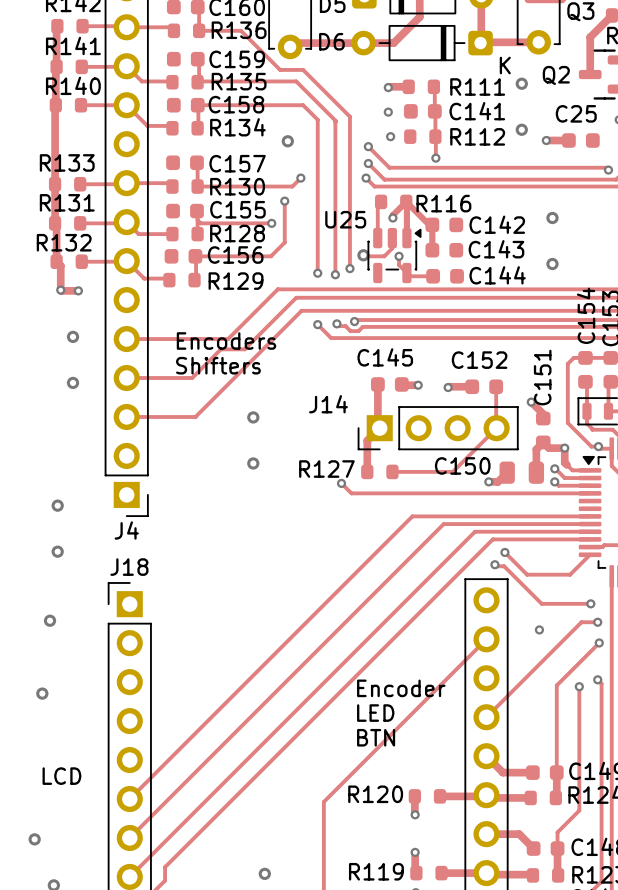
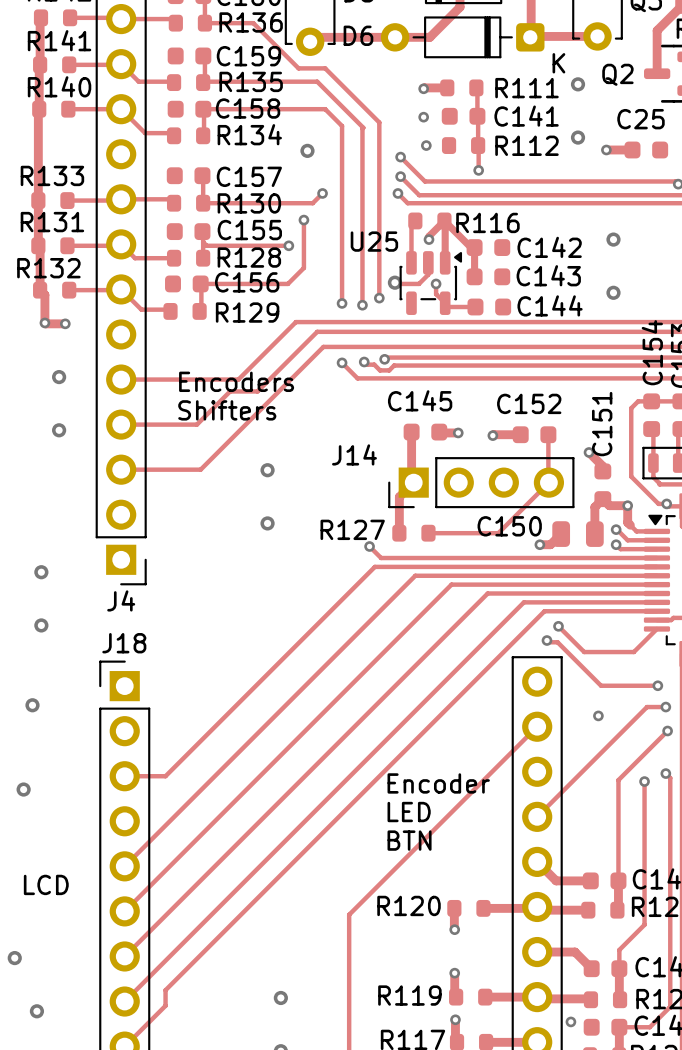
track: none -> (656, 566) (374, 566) (165, 776) (124, 776)
track: none -> (656, 575) (415, 575) (124, 866)

